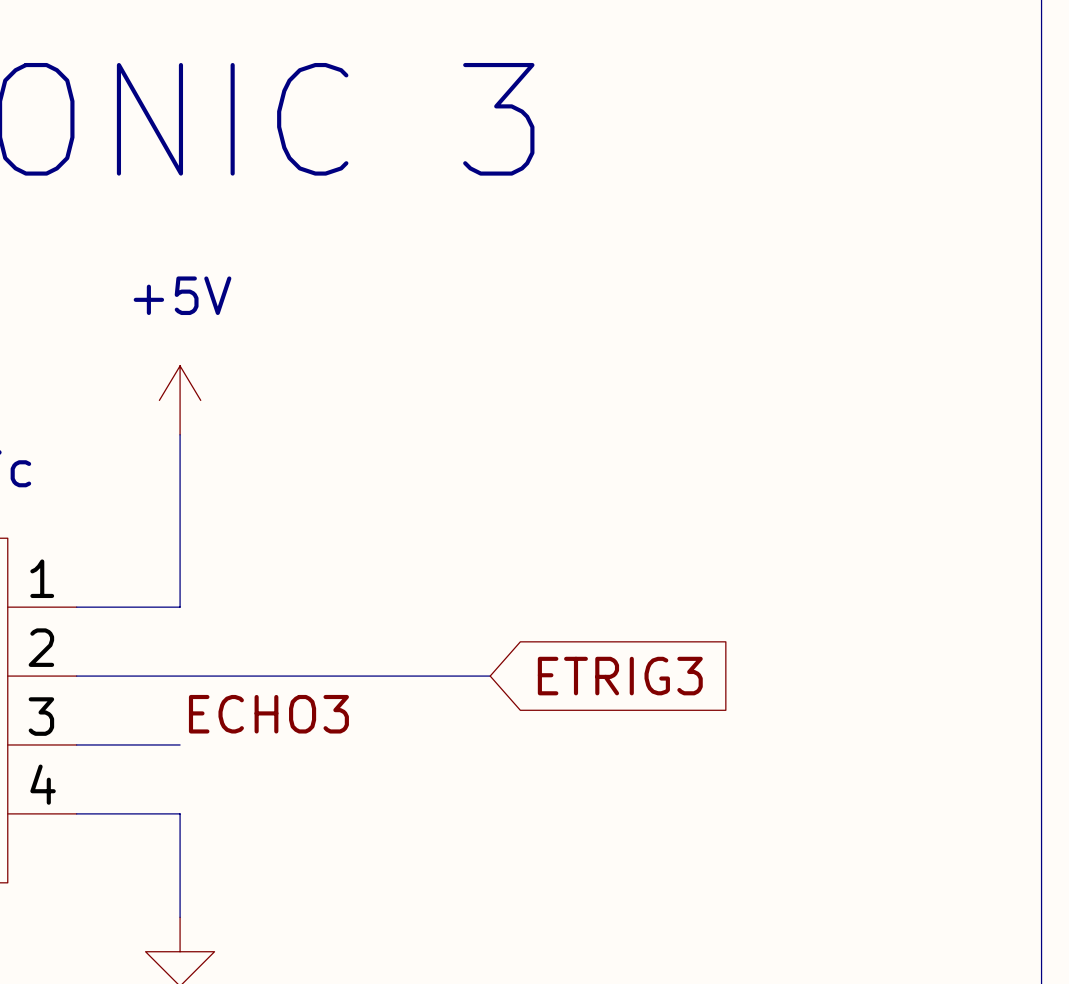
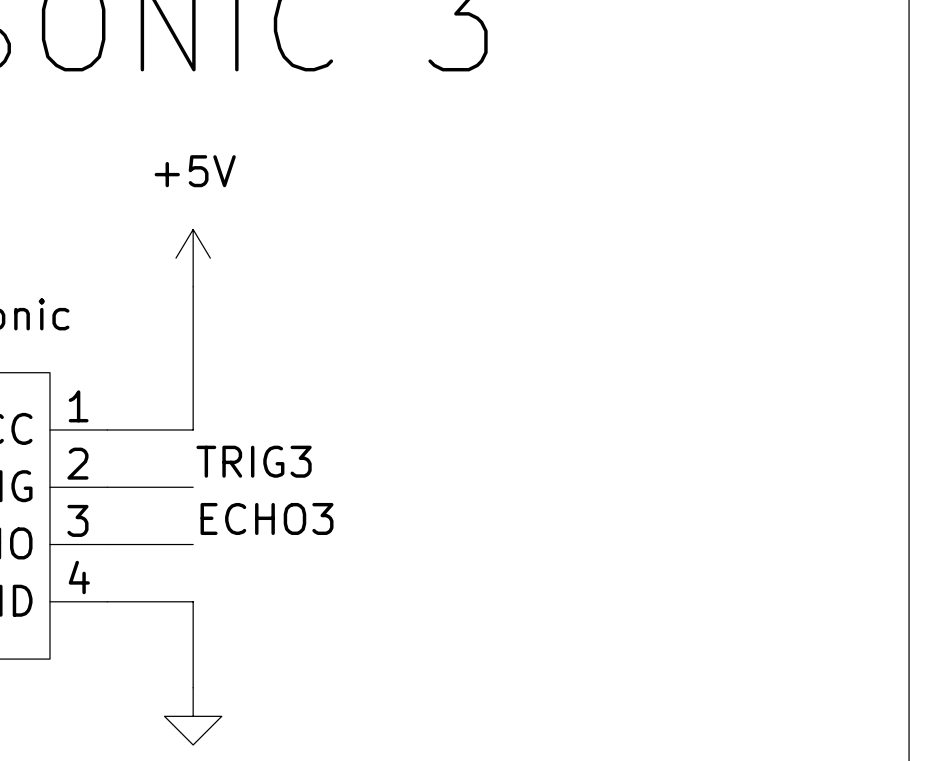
label: none -> TRIG3 (254, 461)
wire: (180, 676) (490, 676) -> none
global label: ETRIG3 (620, 676) -> none

